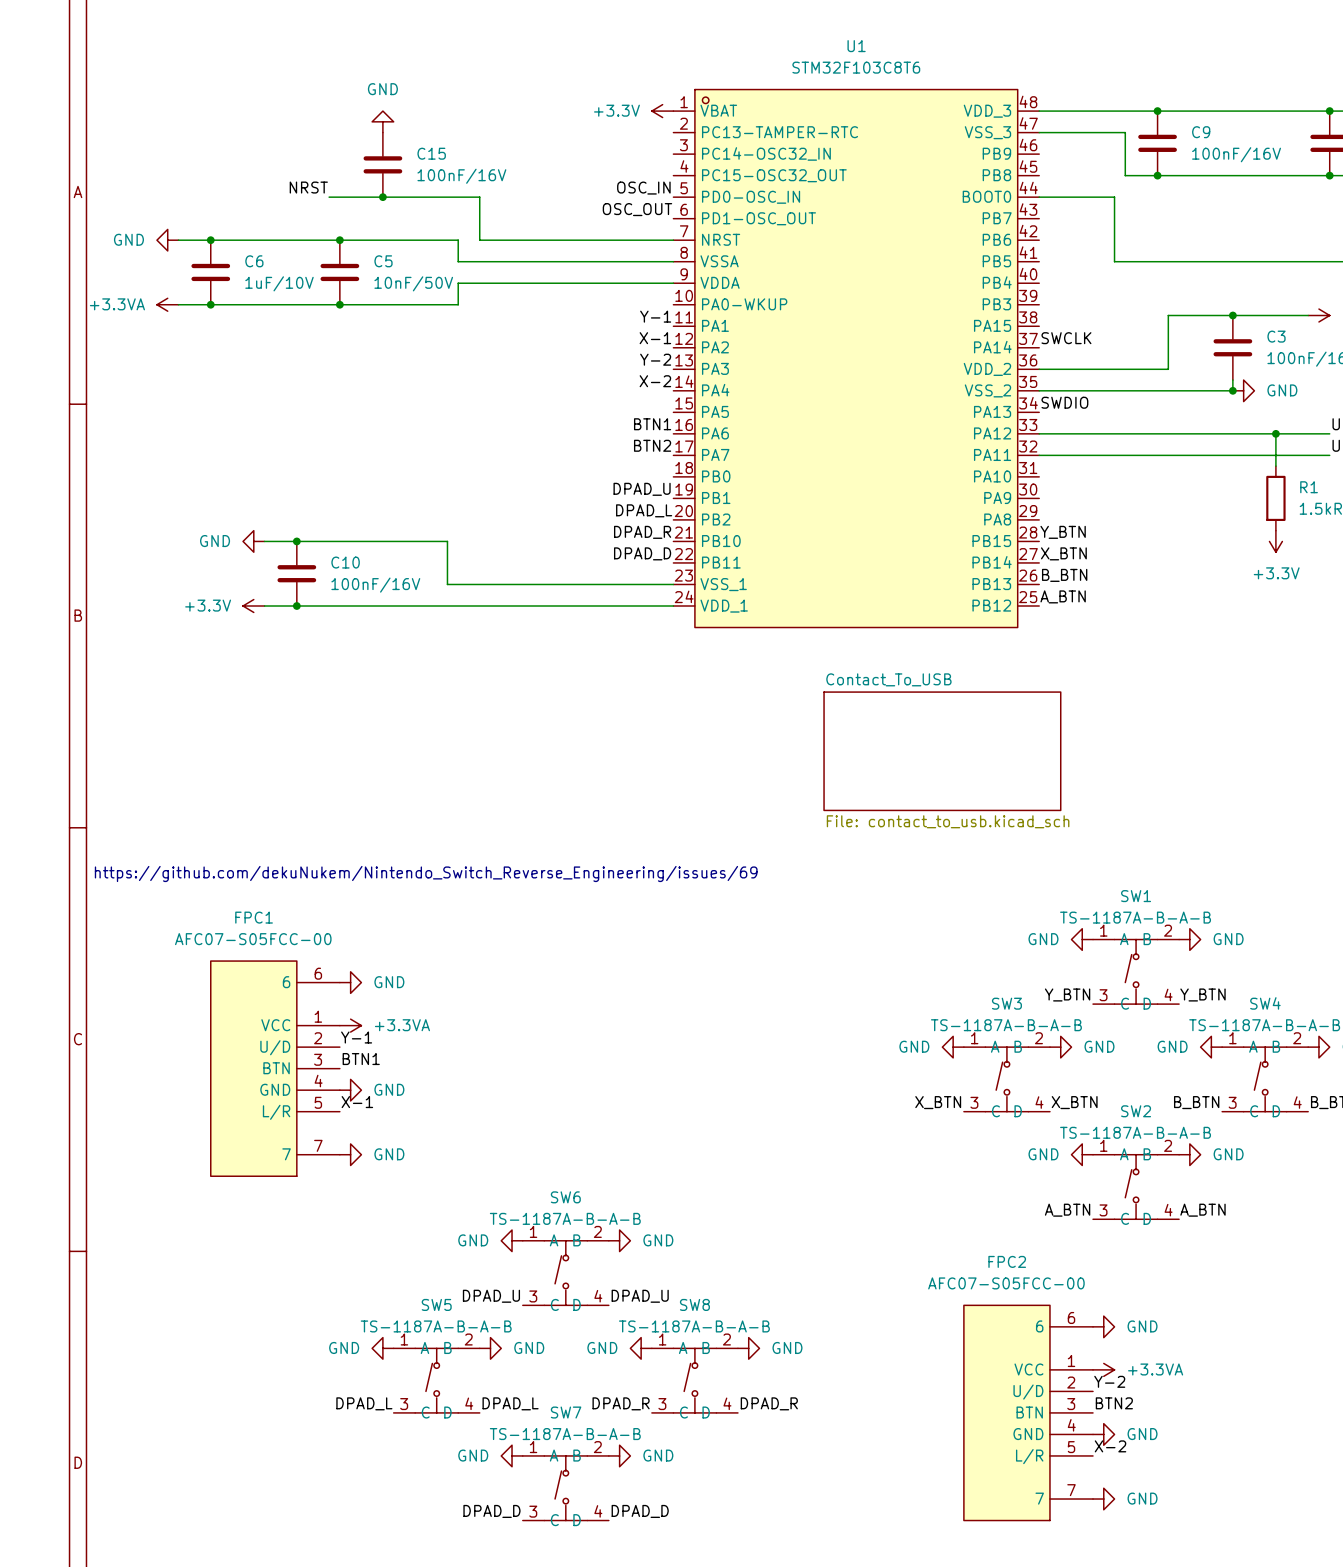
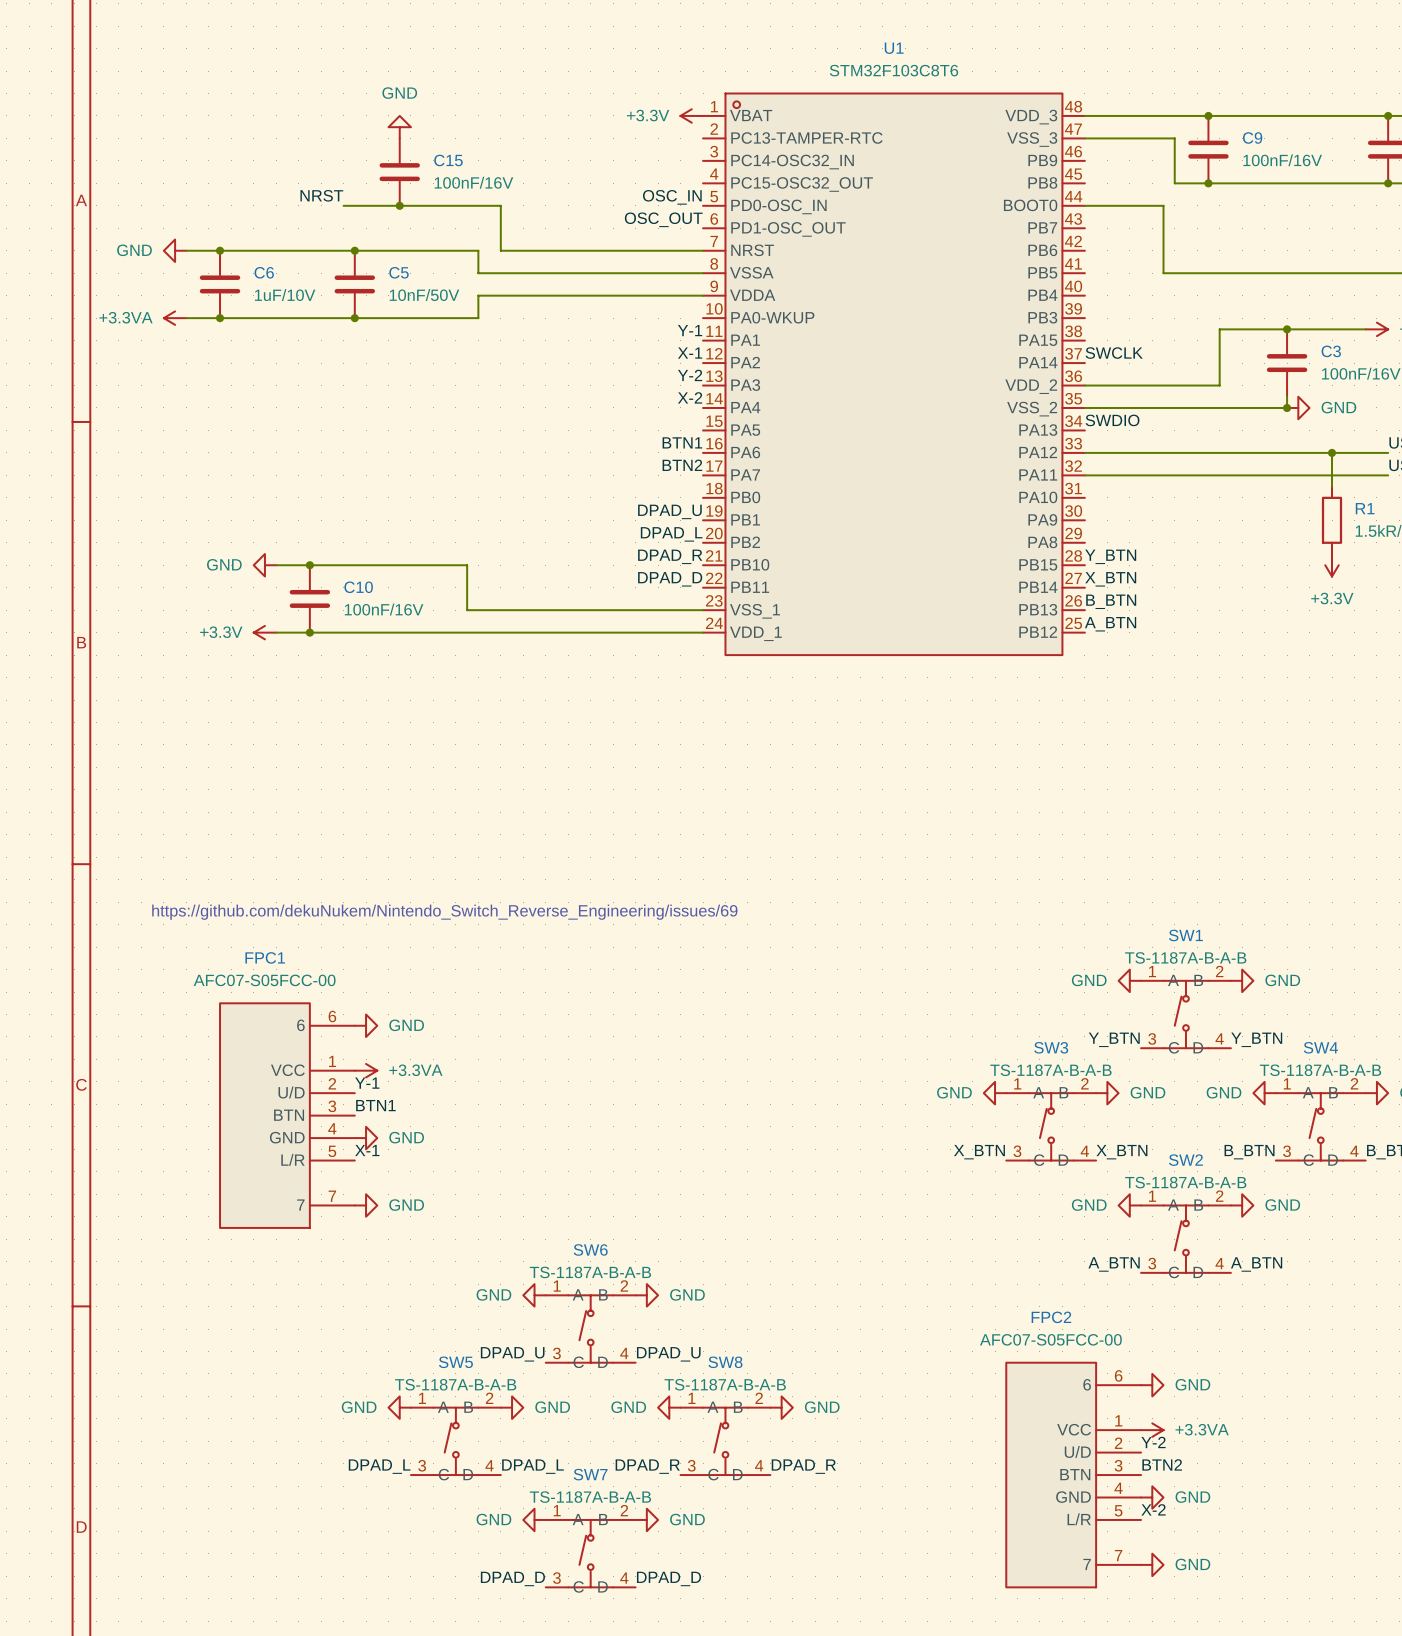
sheet Contact_To_USB: File: contact_to_usb.kicad_sch (942, 751) -> none

